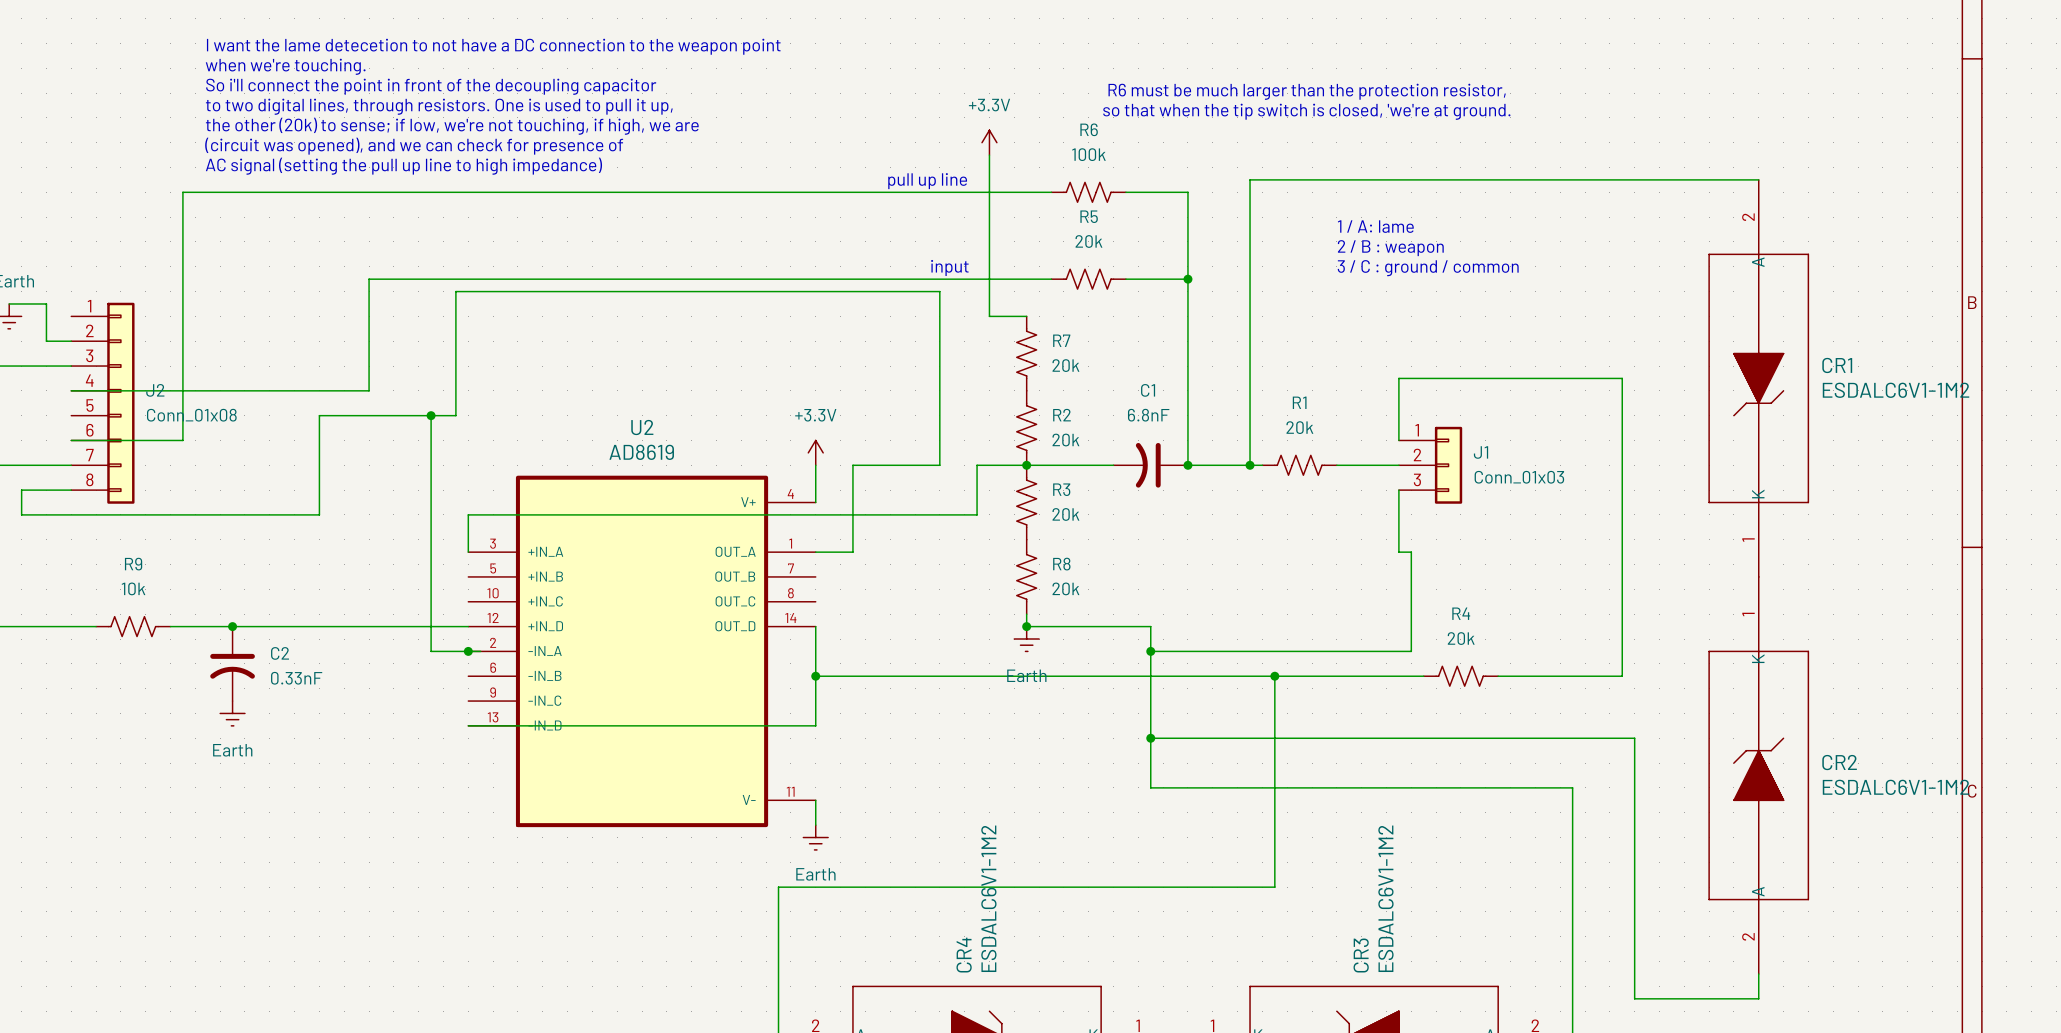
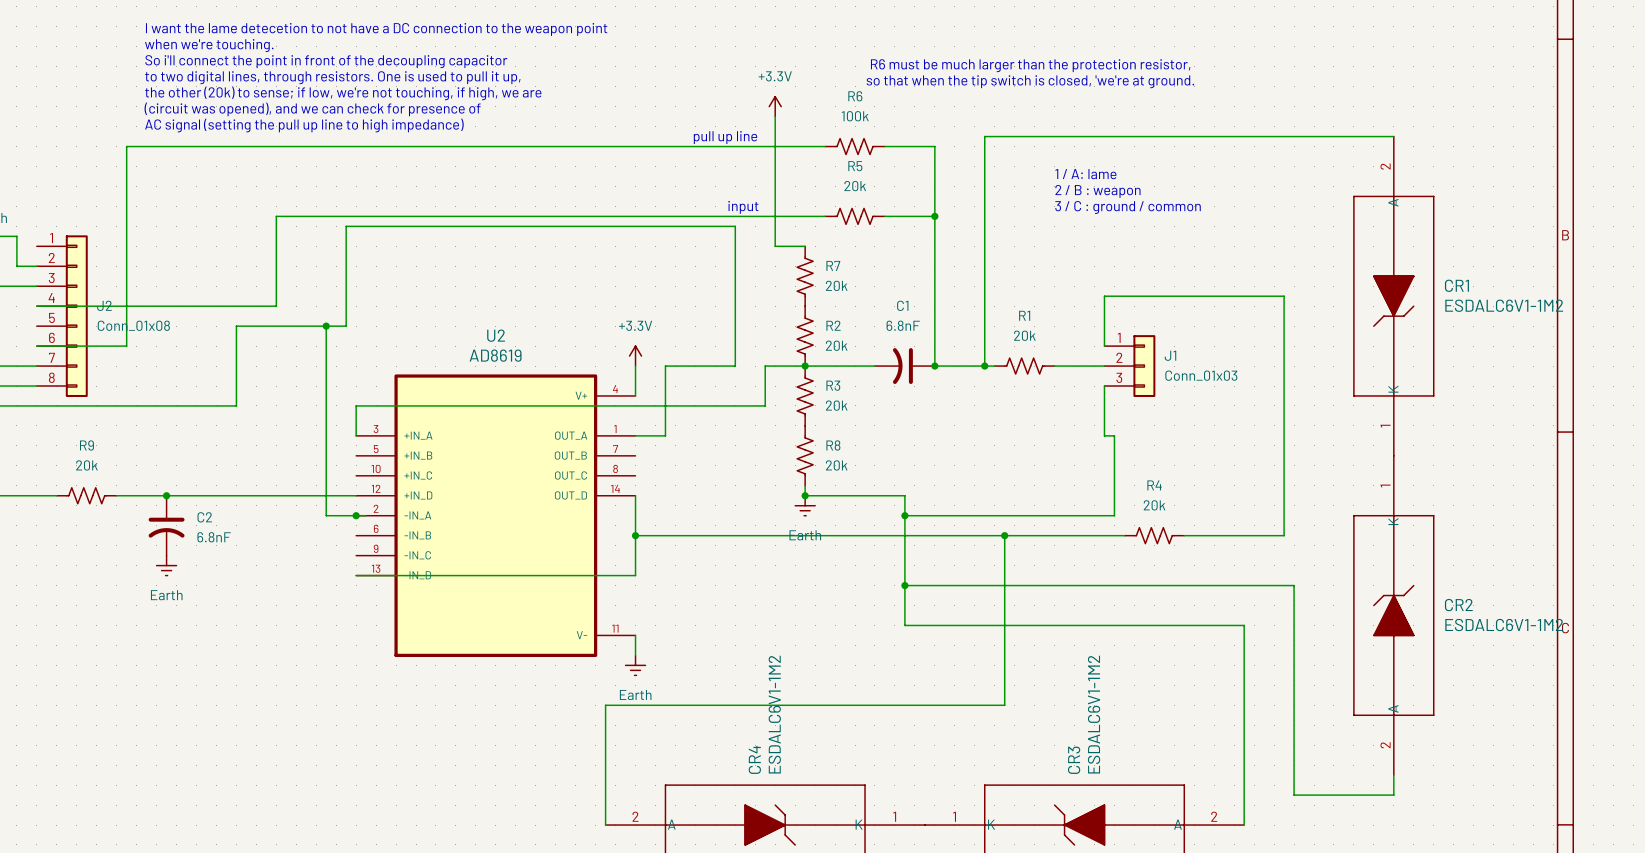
R9 value: 10k (133, 588) -> 20k (86, 465)
C2 value: 0.33nF (296, 678) -> 6.8nF (214, 537)

